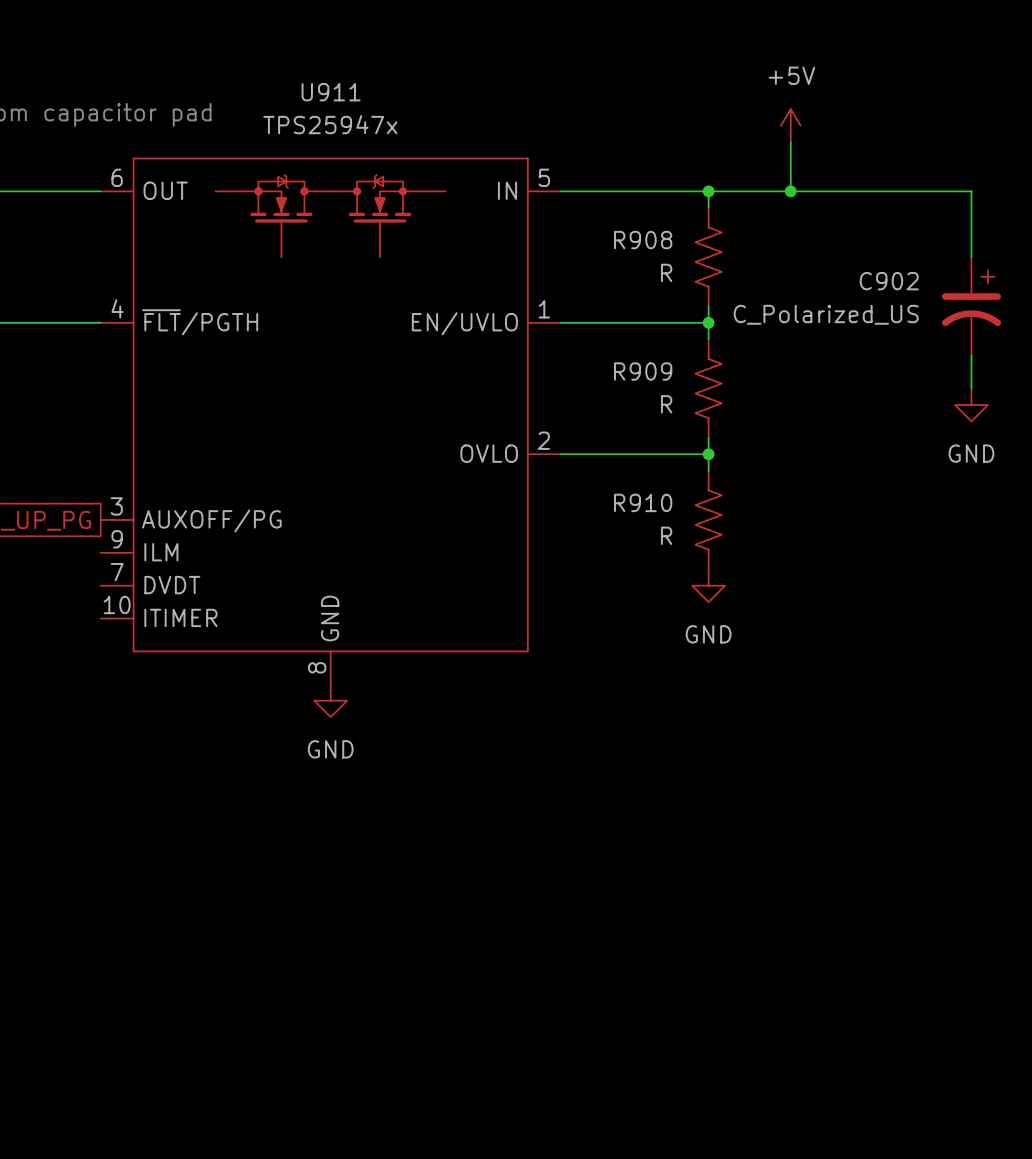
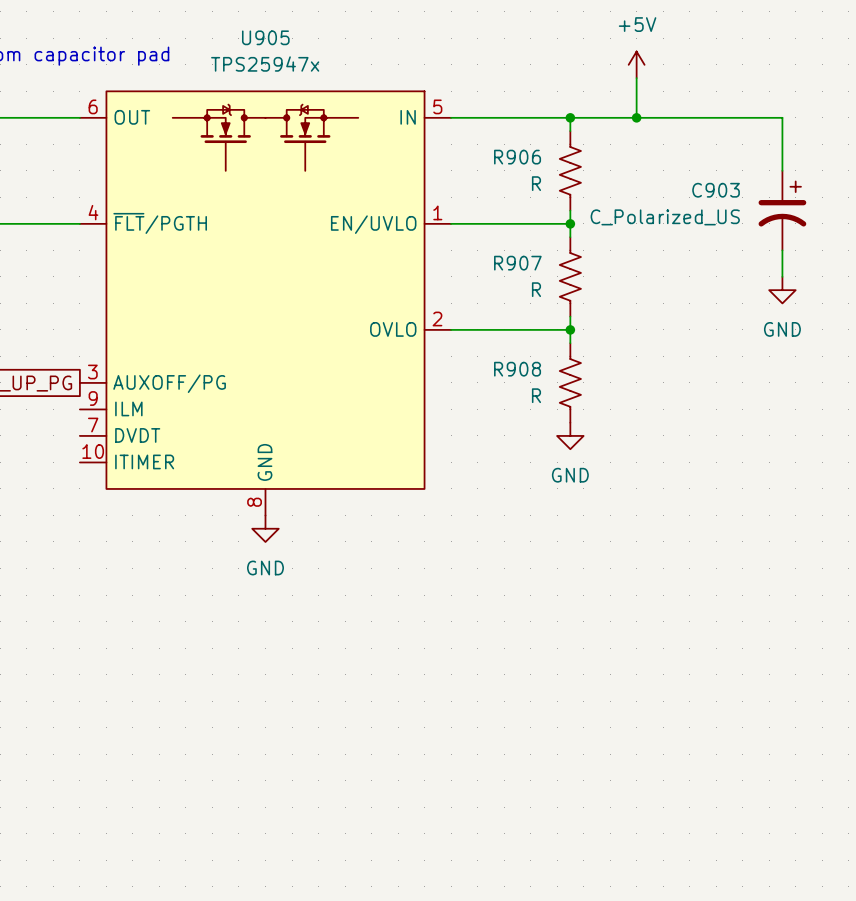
U911 name: U911 (331, 92) -> U905 (265, 37)
R908 name: R908 (643, 240) -> R906 (517, 157)
C902 name: C902 (889, 281) -> C903 (716, 190)
R909 name: R909 (643, 371) -> R907 (517, 263)
R910 name: R910 (643, 502) -> R908 (517, 369)

